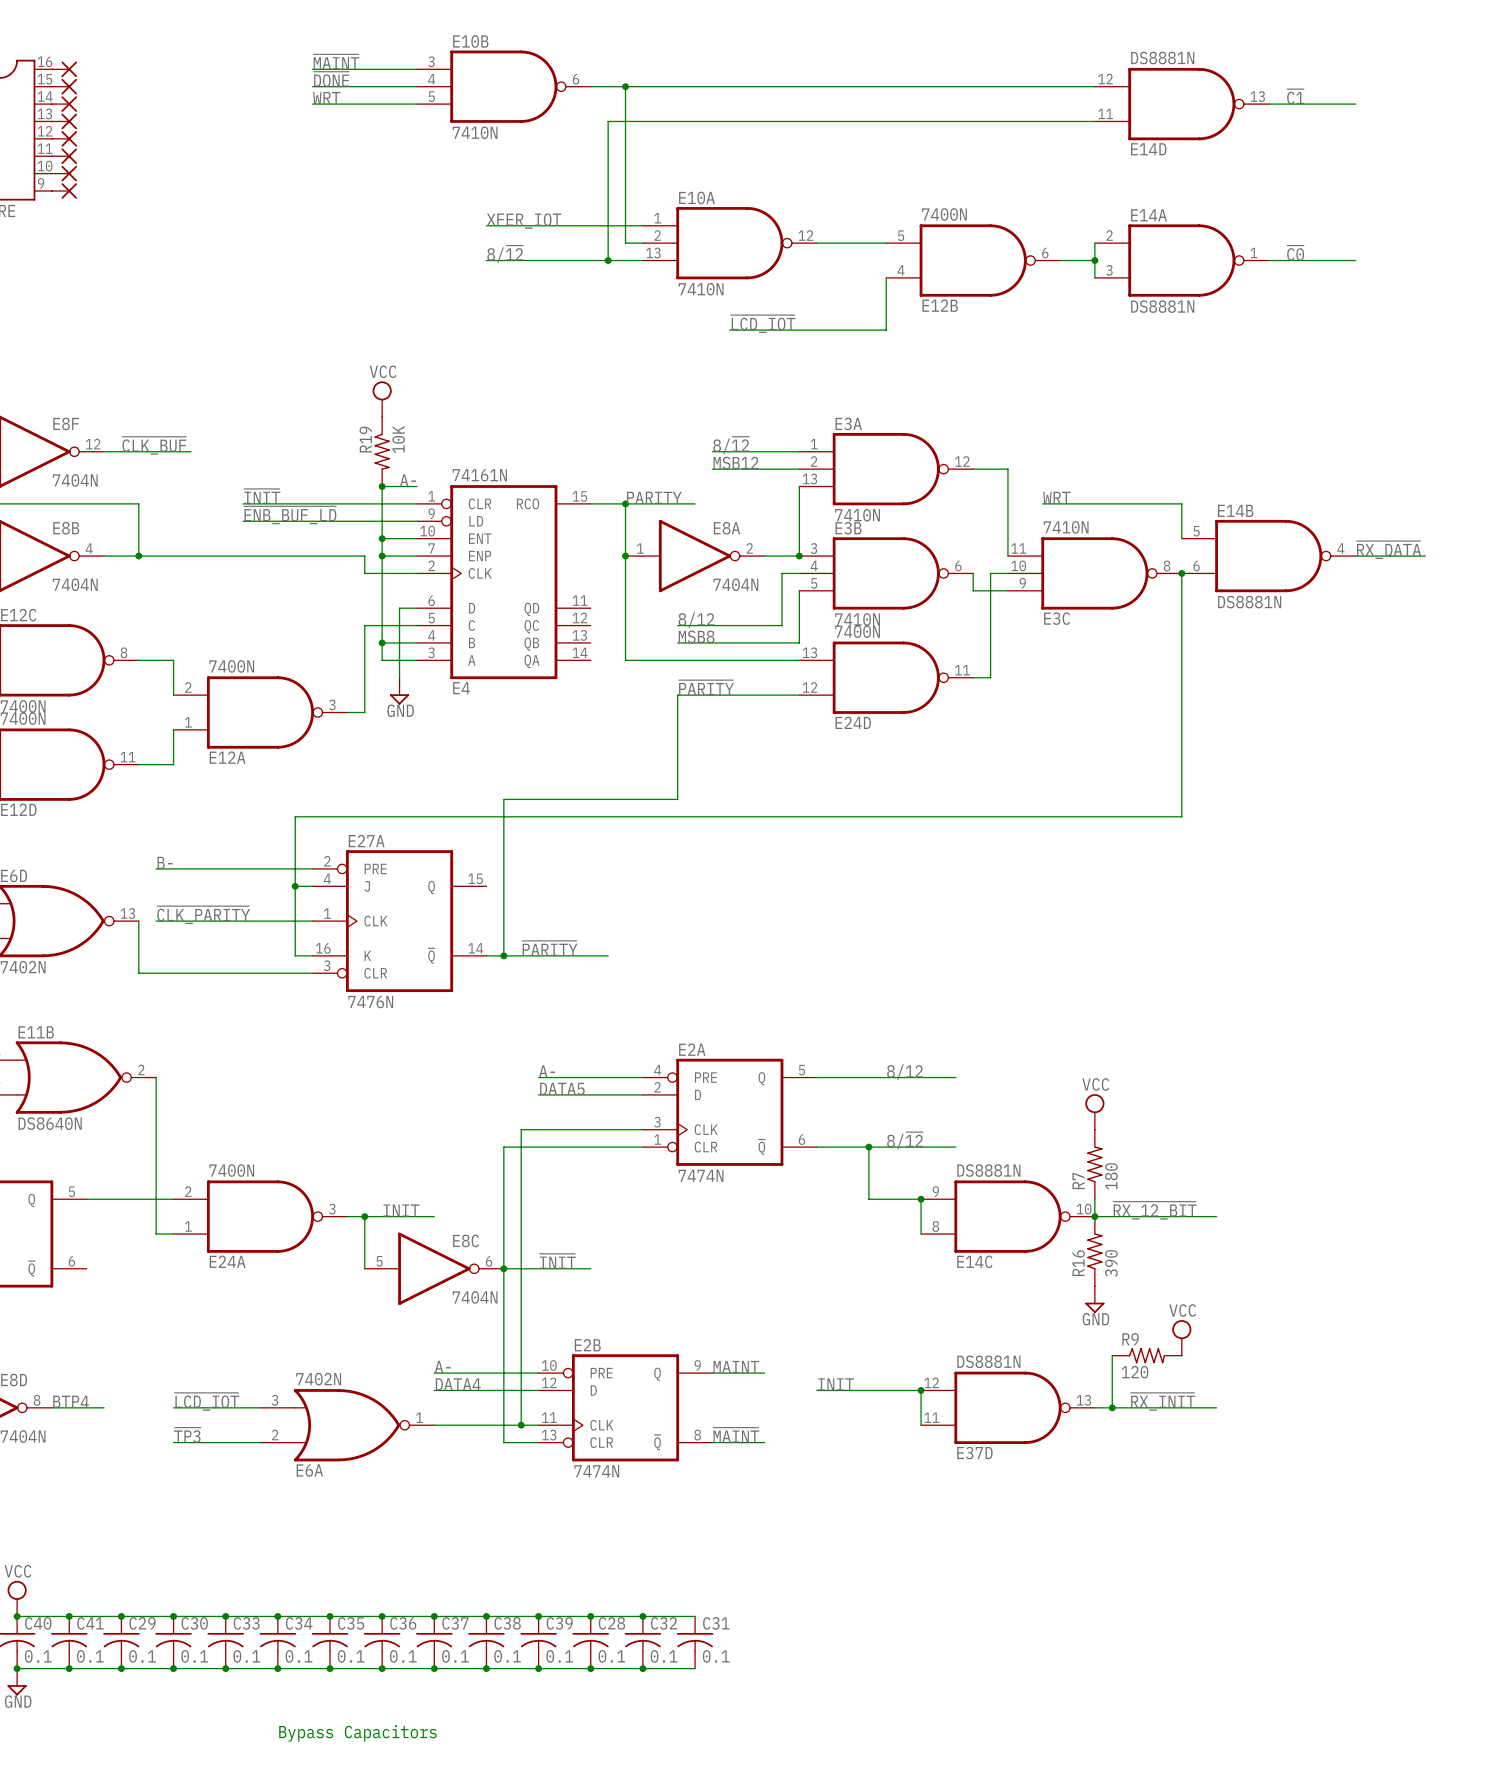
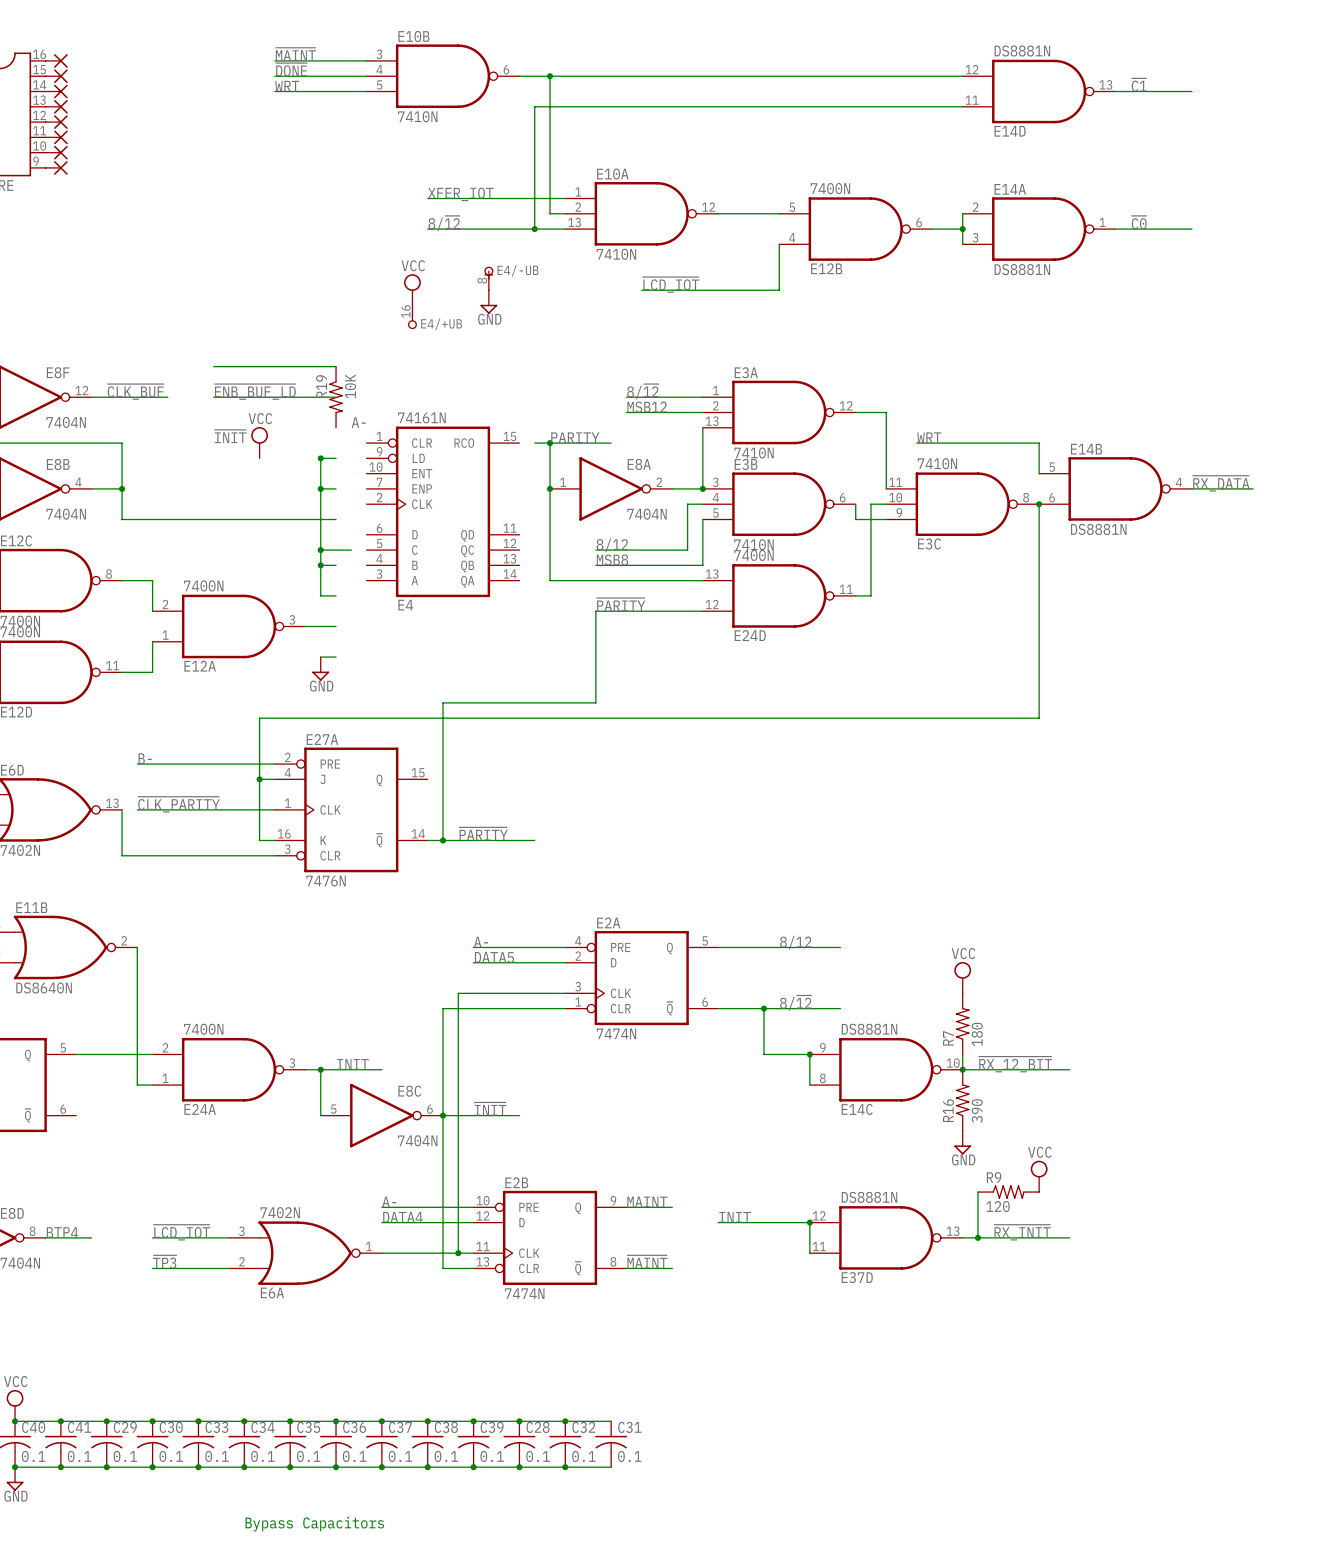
E4/-UB: none -> (488, 278)
power symbol: none -> VCC (412, 289)
power symbol: none -> GND (488, 302)
E4/+UB: none -> (412, 317)
power symbol: VCC (382, 399) -> none
wire: none -> (213, 366) (336, 366)
wire: none -> (213, 397) (336, 397)
junction: (382, 486) -> none
wire: (416, 486) (382, 486) (382, 660) (416, 660) -> none
wire: (243, 503) (416, 503) -> none
power symbol: none -> VCC (259, 442)
wire: (590, 503) (608, 503) -> none
label position: ~{ENB_BUF_LD} (290, 515) -> ~{ENB_BUF_LD} (255, 391)
wire: (243, 521) (364, 521) -> none
junction: none -> (320, 458)
wire: (382, 521) (416, 521) -> none
wire: (382, 538) (416, 538) -> none
junction: (382, 538) -> none
wire: (138, 556) (364, 556) -> (122, 488) (122, 519) (336, 519)
junction: none -> (320, 488)
wire: (382, 556) (416, 556) -> (336, 488) (320, 488) (320, 458)
junction: (382, 556) -> none
wire: (364, 573) (416, 573) -> (320, 504) (320, 550)
wire: (416, 608) (399, 608) (399, 677) -> none
junction: none -> (320, 550)
wire: (399, 625) (416, 625) -> (320, 626) (336, 626)
junction: none -> (320, 565)
wire: (382, 642) (416, 642) -> (336, 565) (320, 565)
junction: (382, 642) -> none
wire: (364, 677) (364, 712) -> (320, 595) (336, 595)
power symbol position: GND (399, 691) -> GND (320, 668)
wire: none -> (320, 657) (336, 657)

